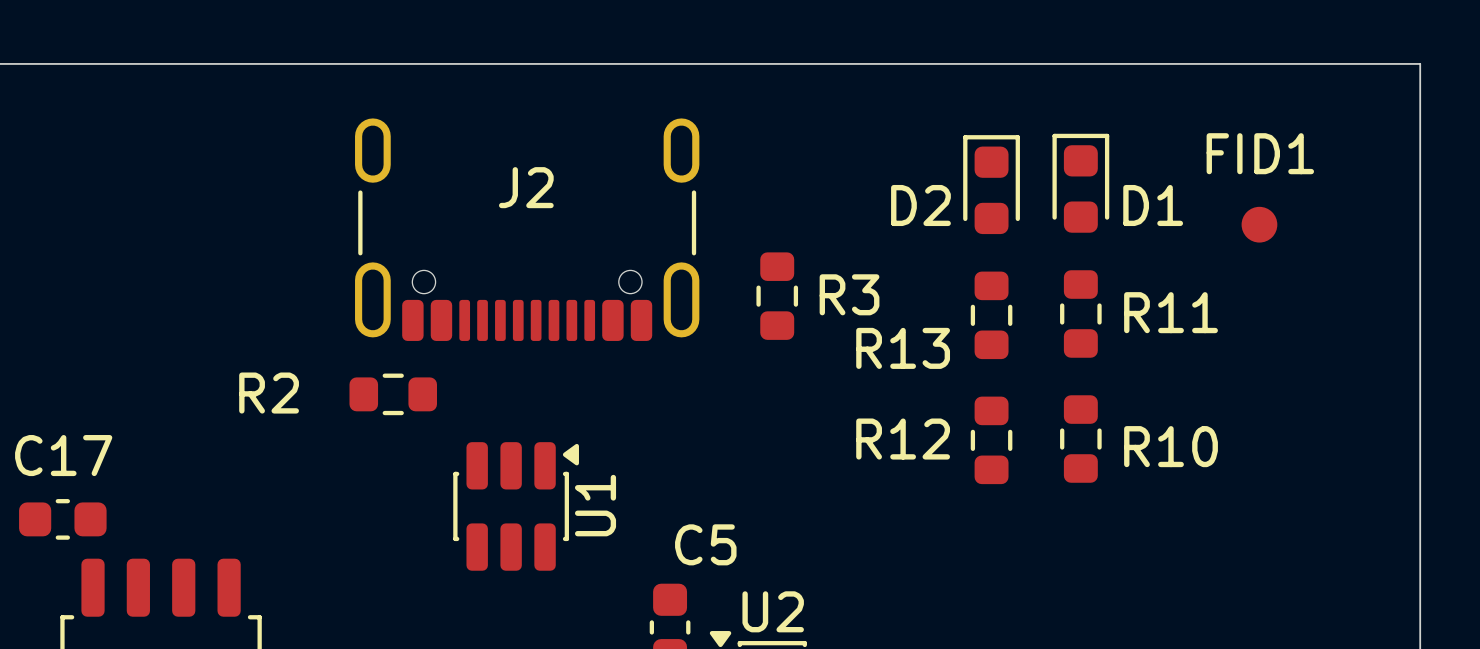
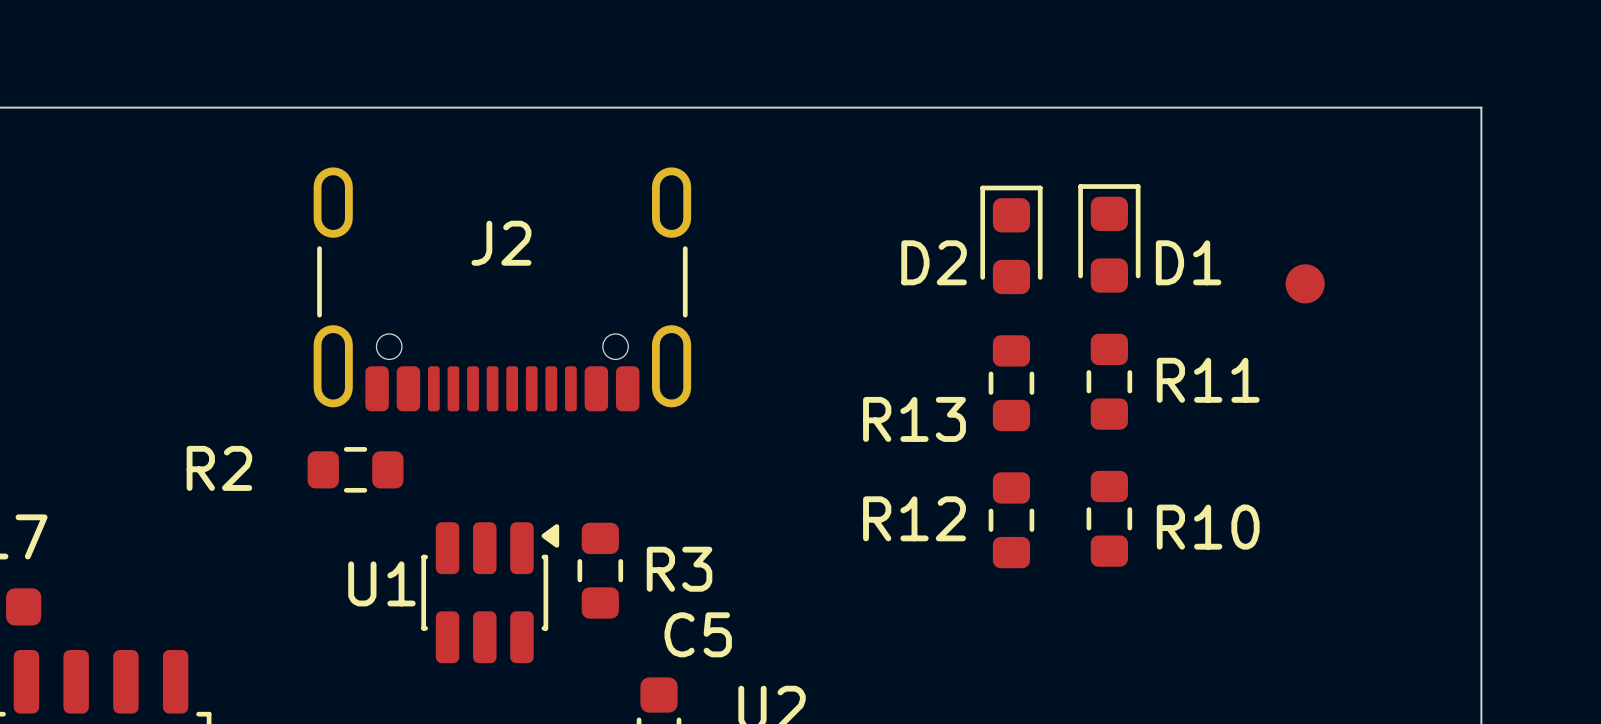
FID1 name: FID1 (1260, 153) -> none
R3 position: (777, 296) -> (600, 570)
U1 name rotation: 0° (595, 505) -> 90° clockwise (381, 583)
U1 name position: U1 (595, 505) -> U1 (381, 583)

